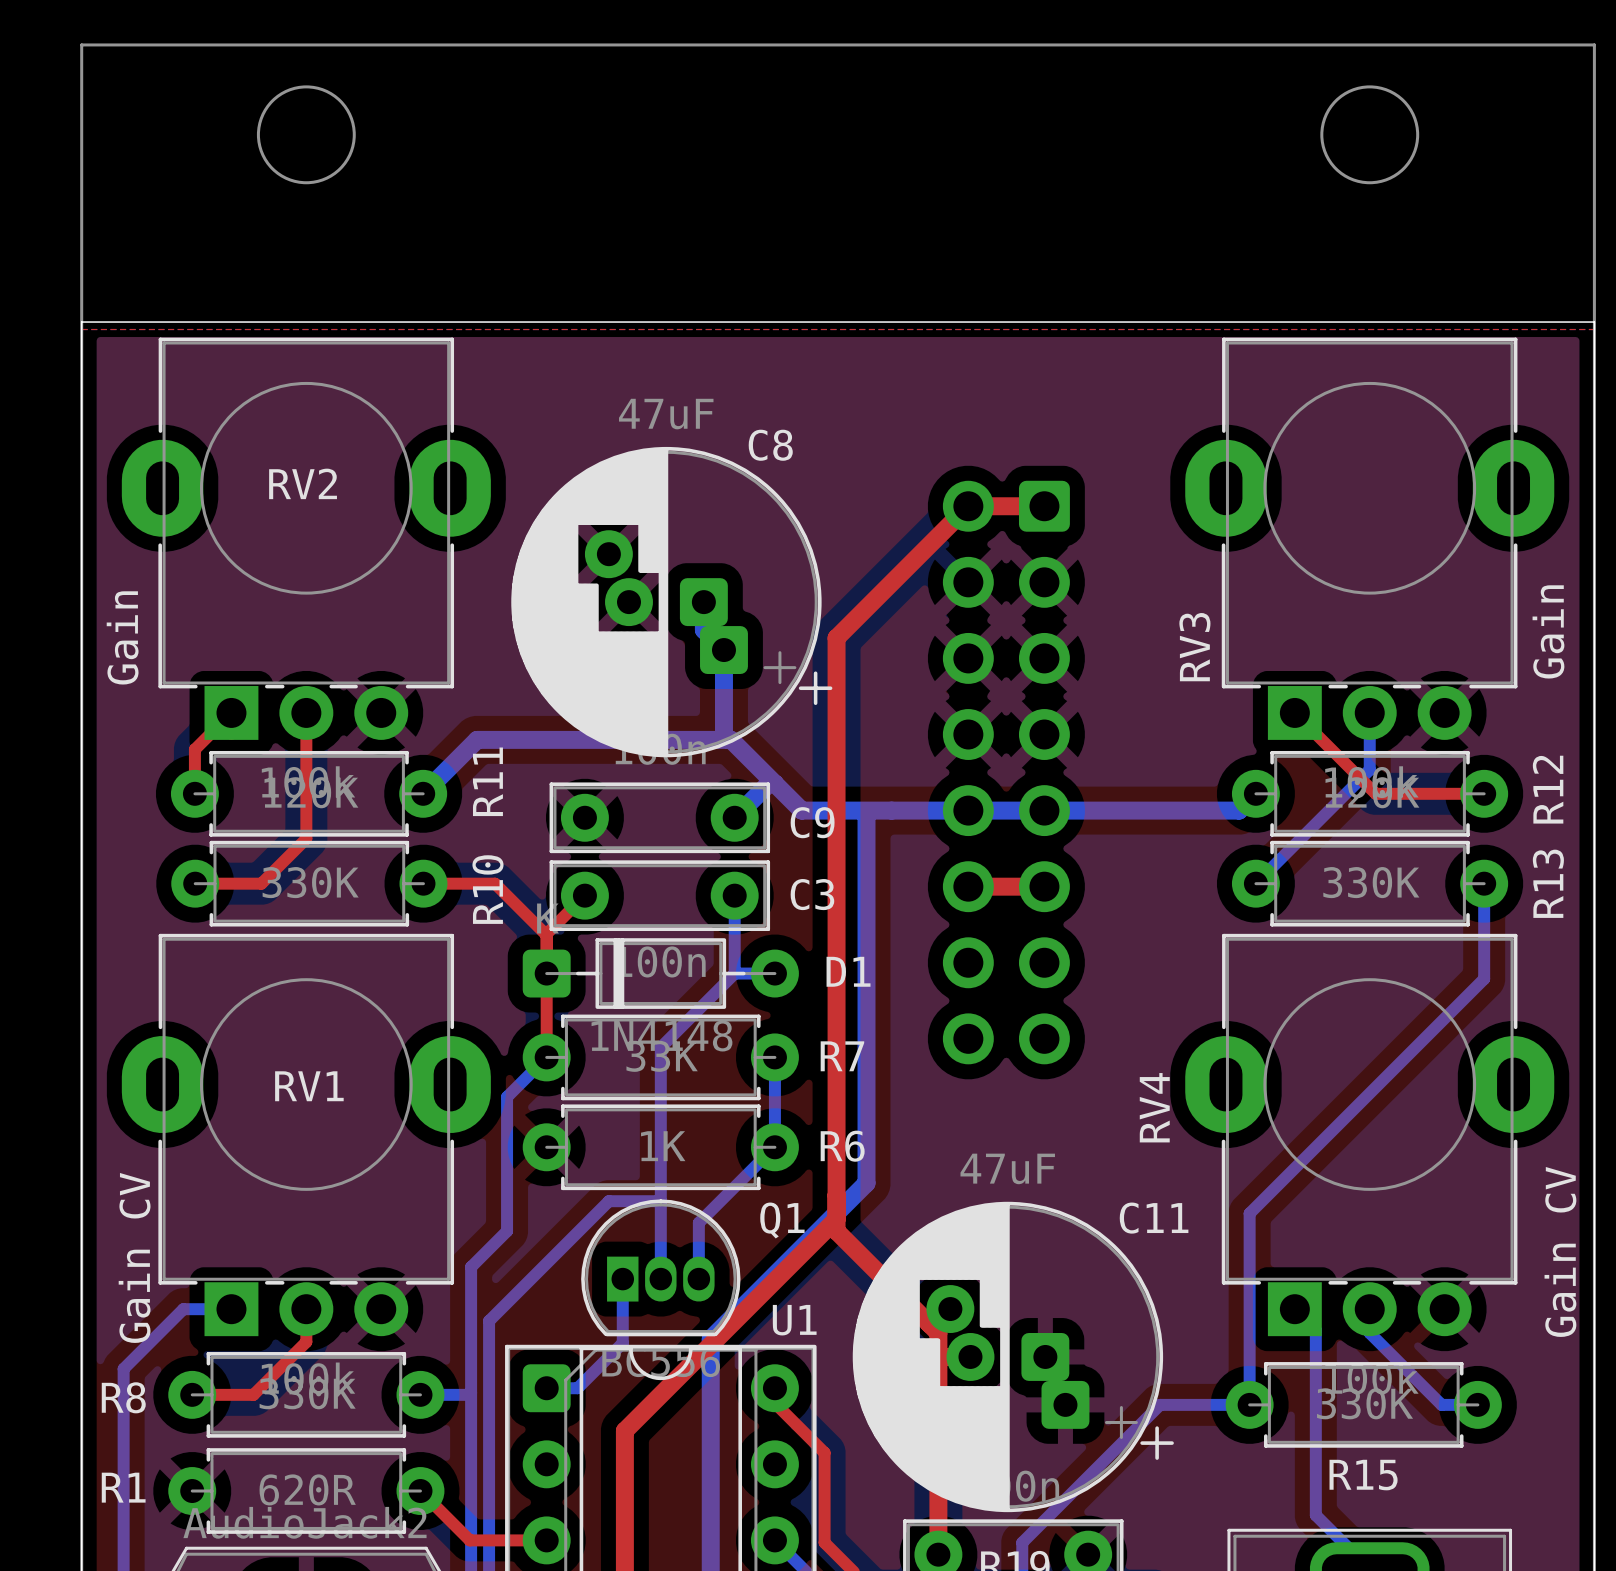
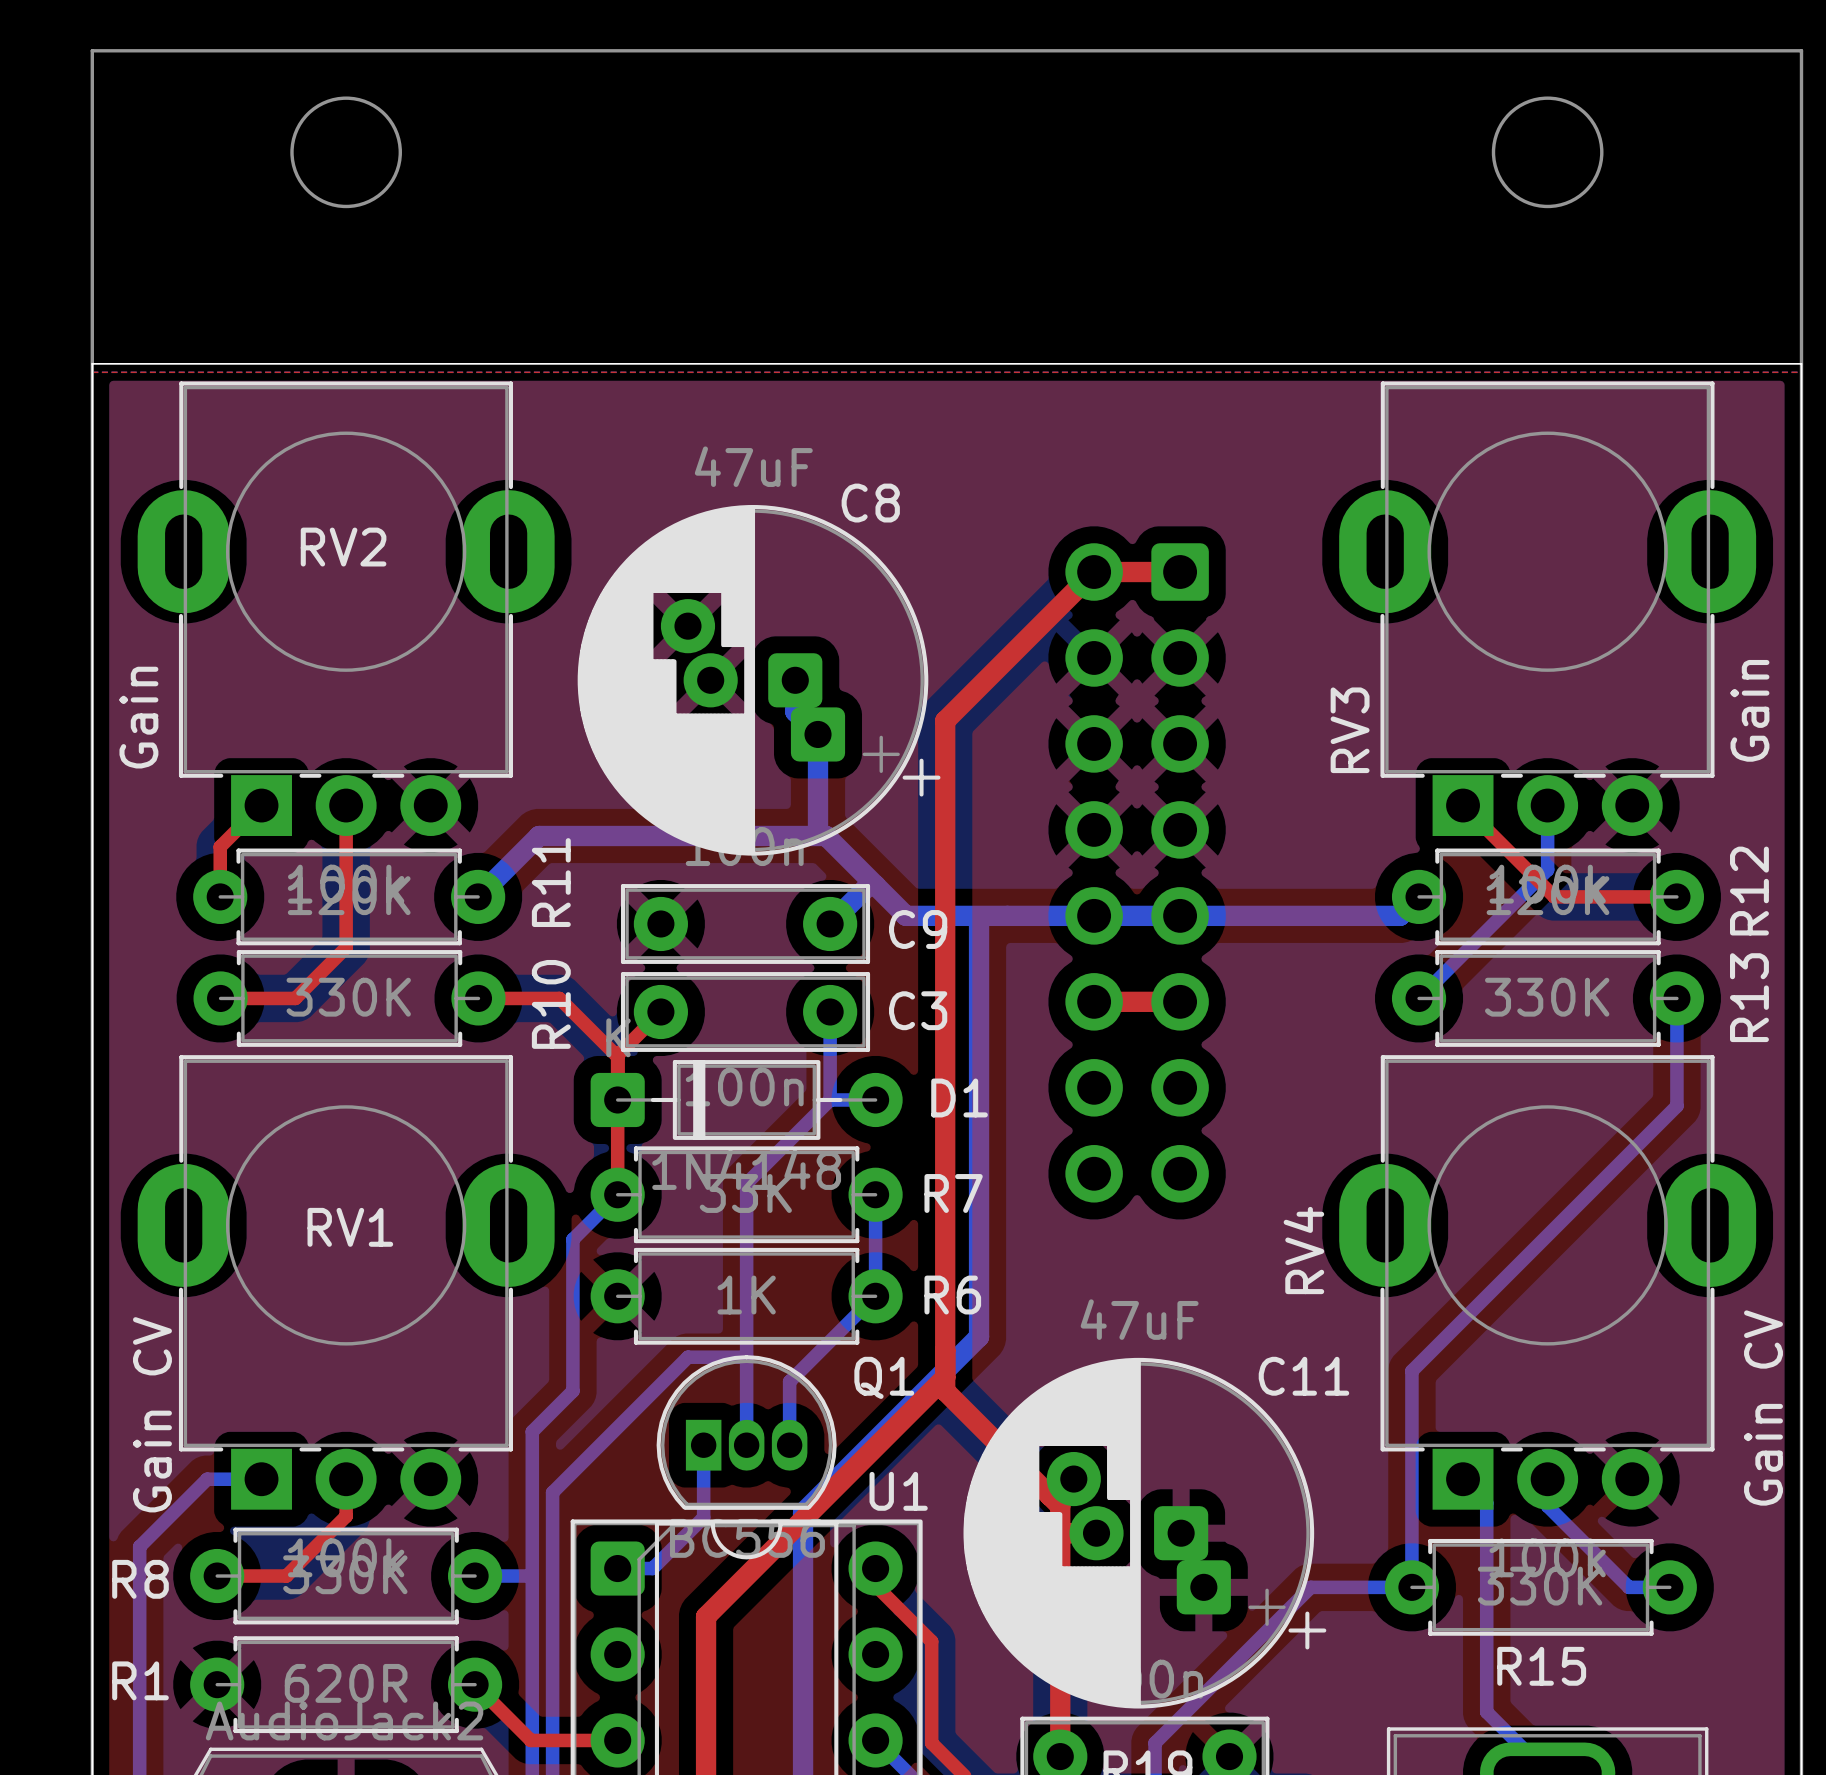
RV2 footprint: [121, 337, 491, 740] -> [137, 381, 555, 836]
RV3 footprint: [1185, 337, 1555, 740] -> [1339, 381, 1757, 836]
RV1 footprint: [121, 933, 491, 1337] -> [137, 1055, 555, 1510]
RV4 footprint: [1185, 933, 1555, 1337] -> [1339, 1055, 1757, 1510]

